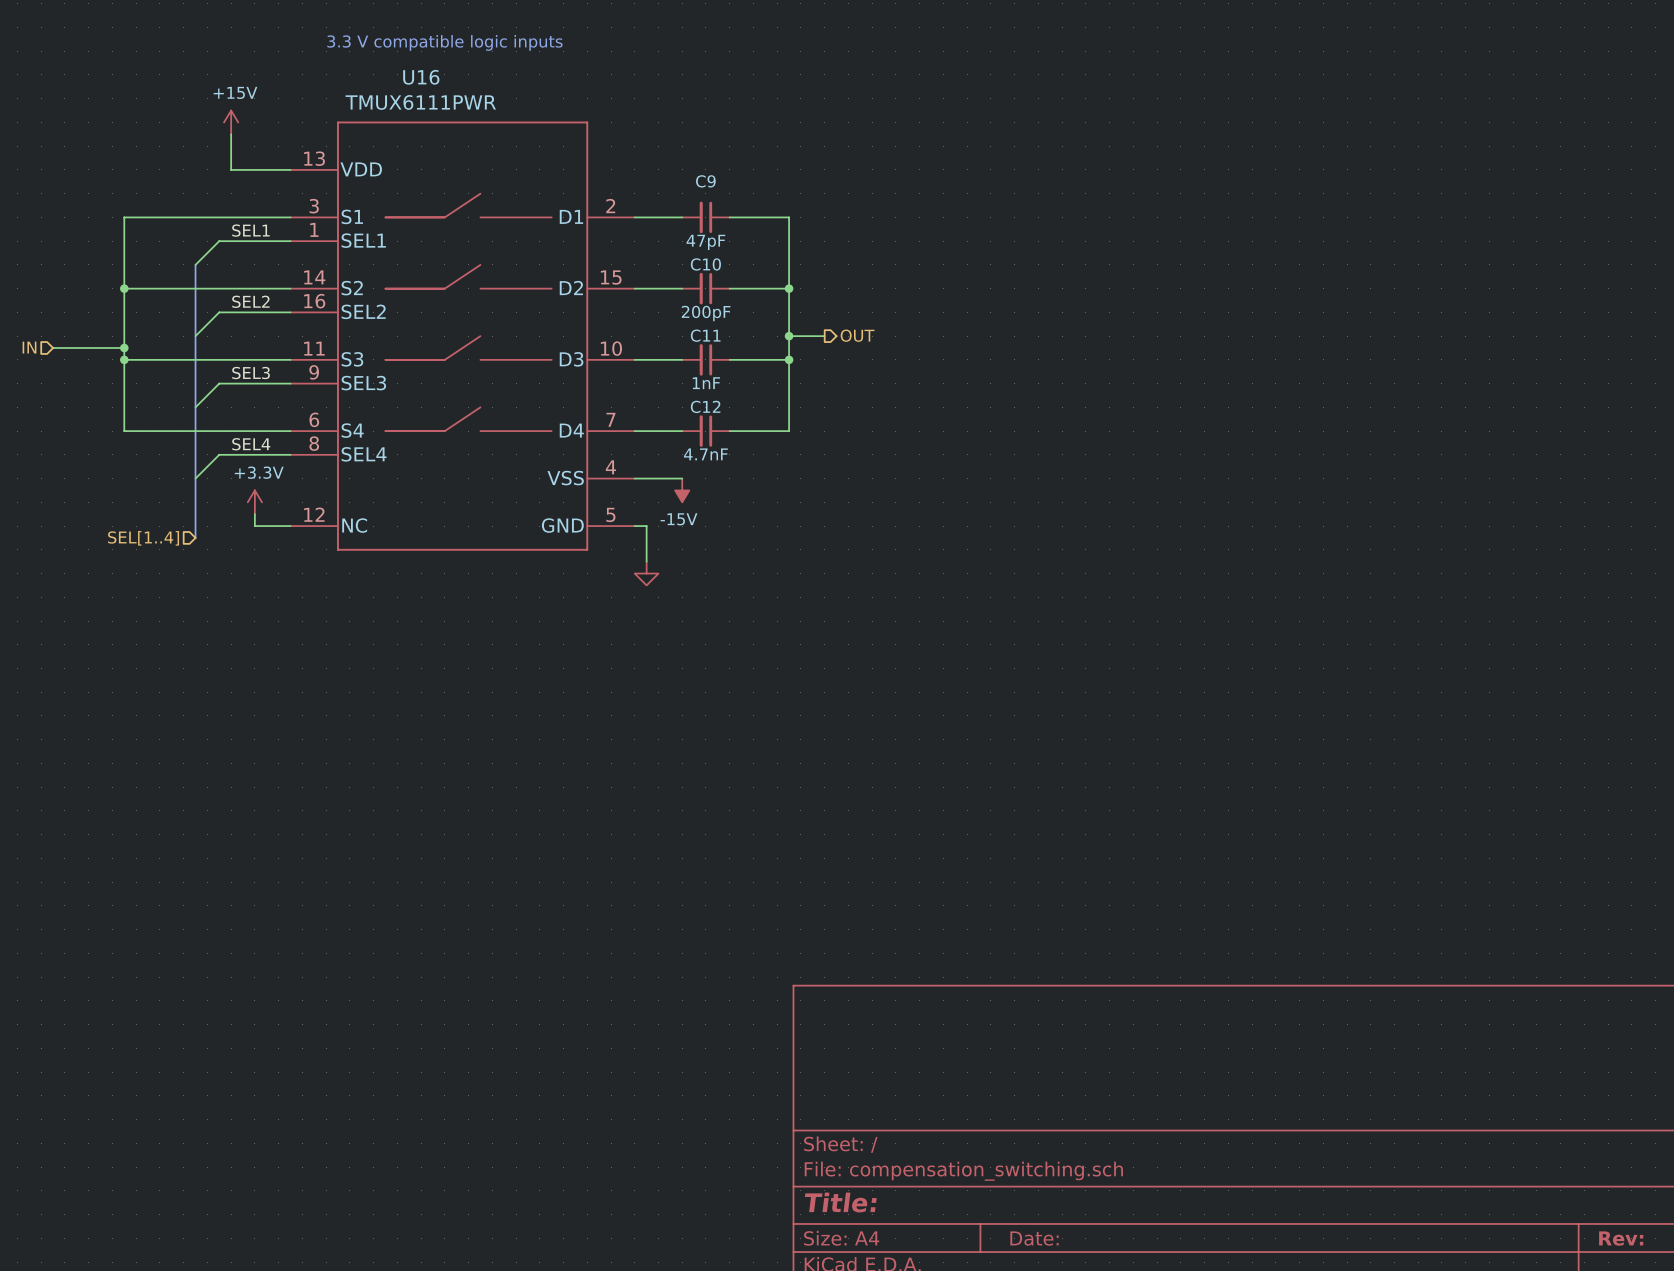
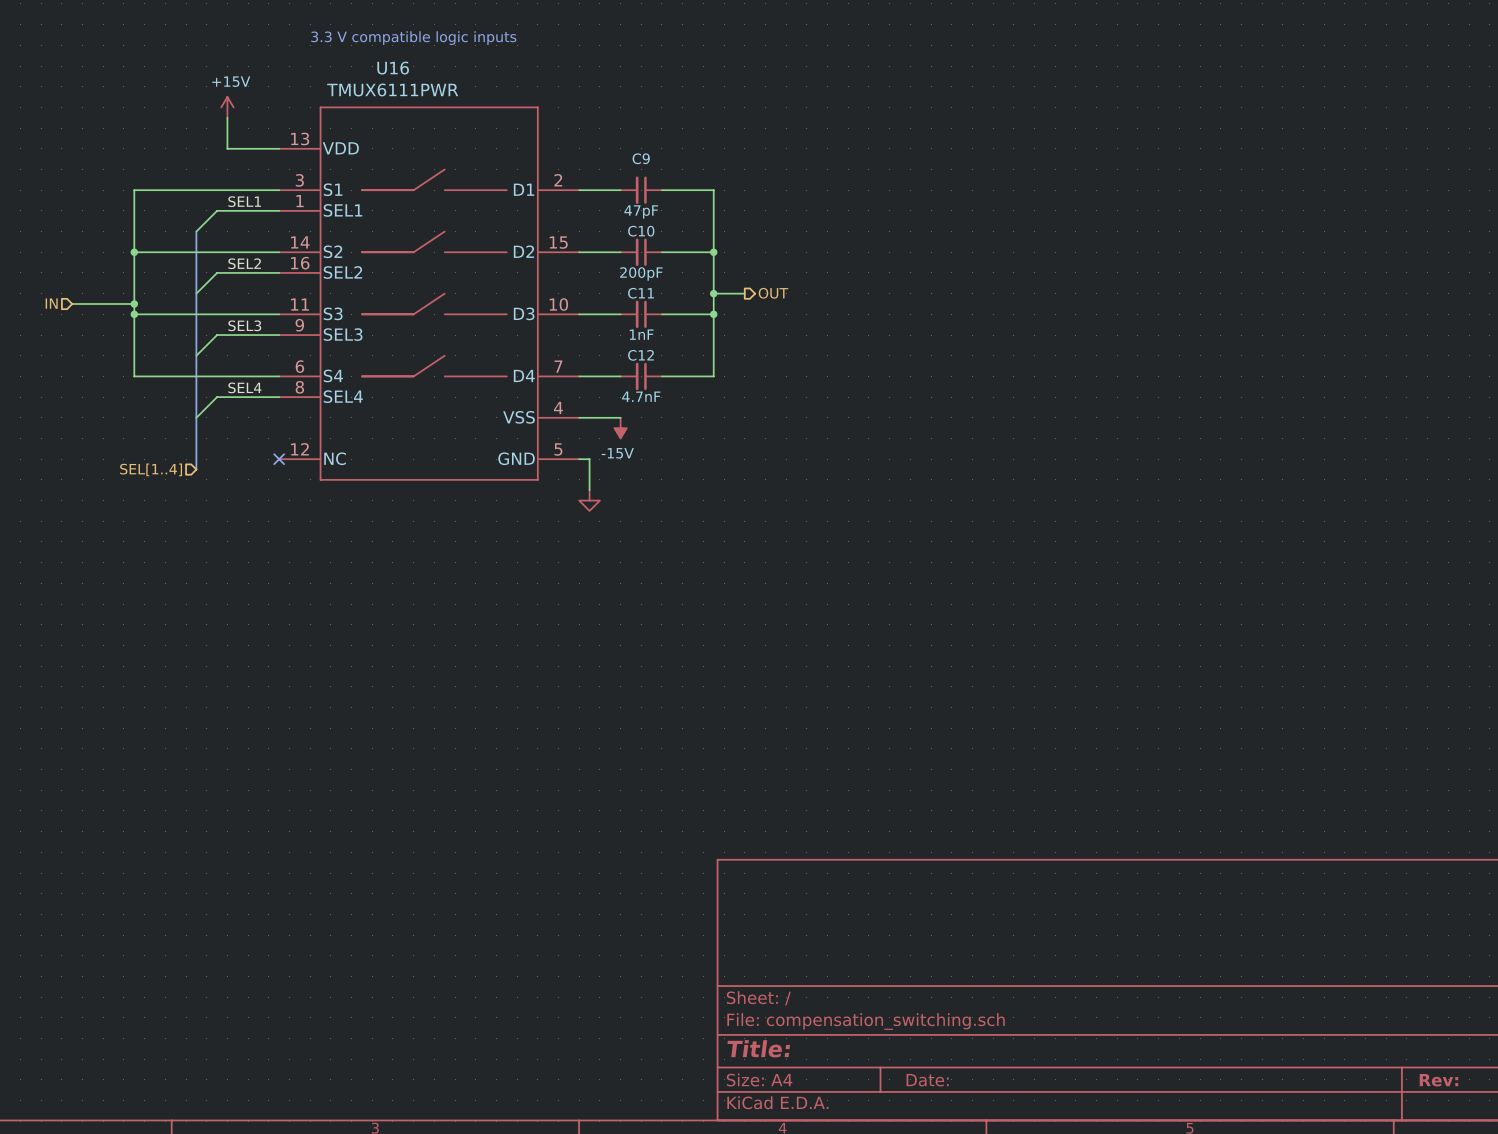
power symbol: +3.3V (254, 502) -> none
wire: (254, 514) (254, 526) (290, 526) -> none
no-connect mark: none -> (279, 459)

